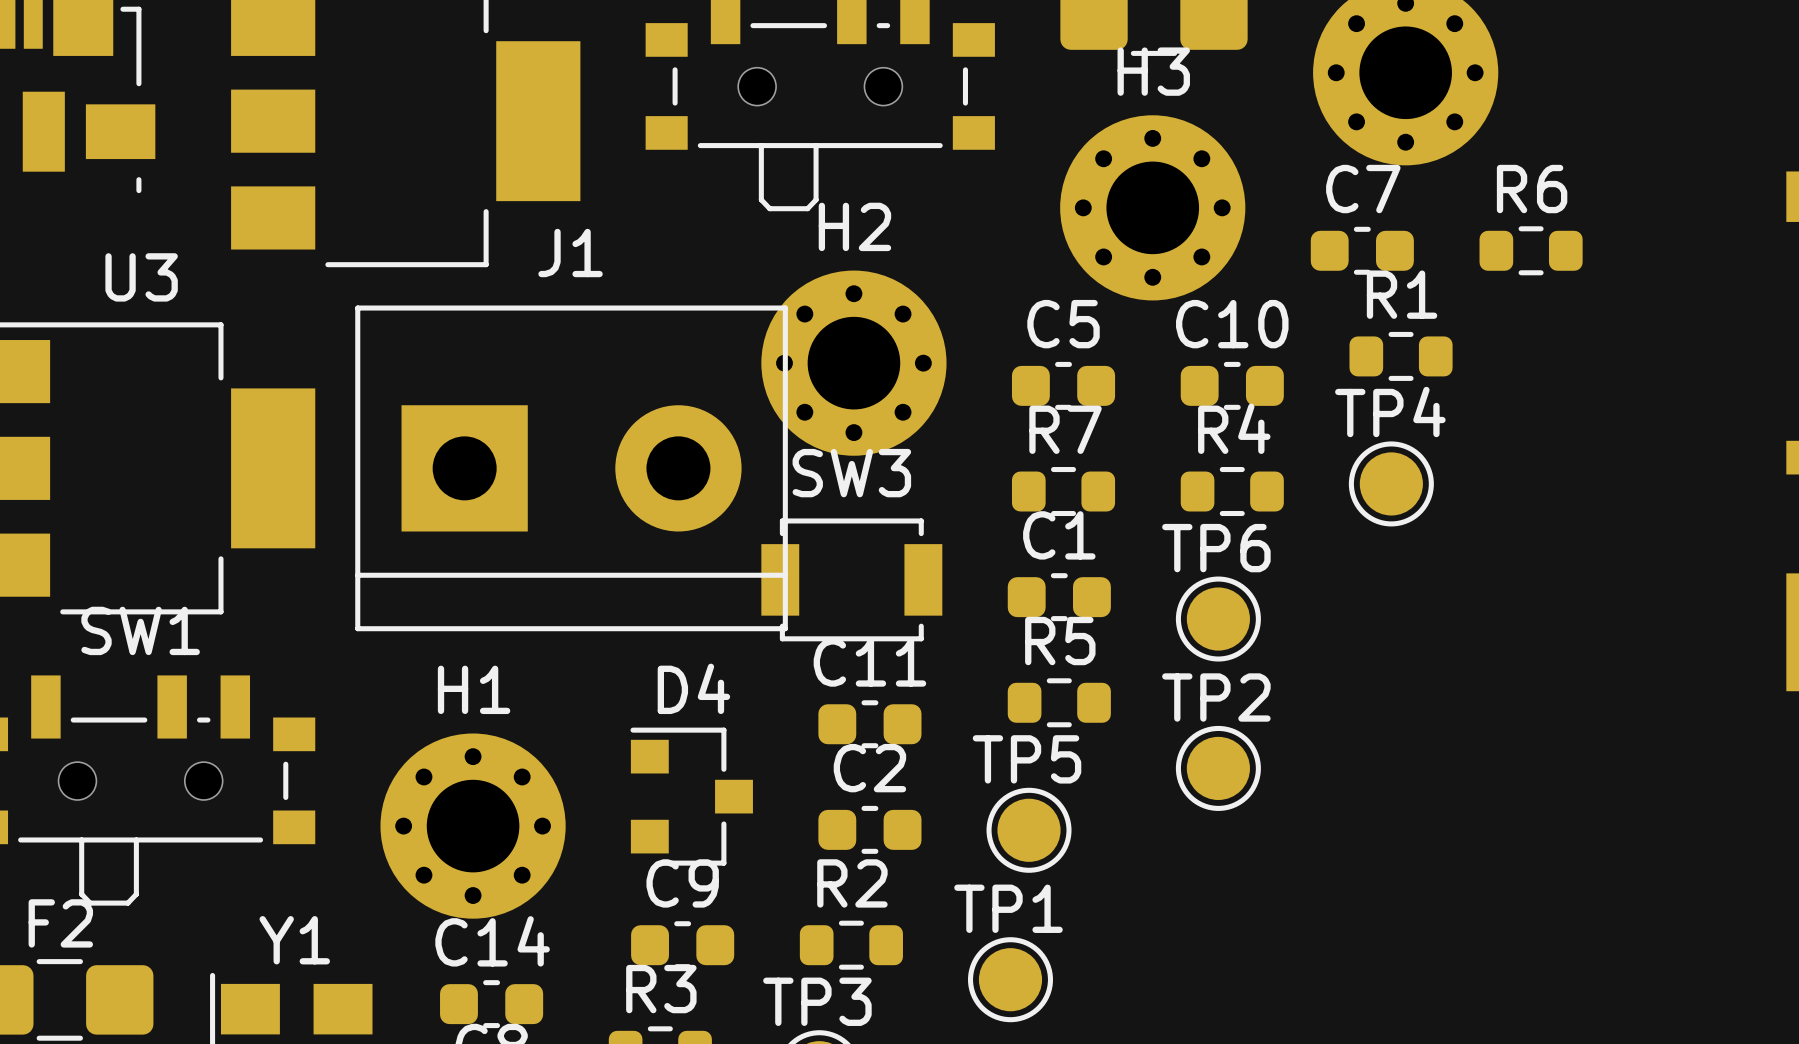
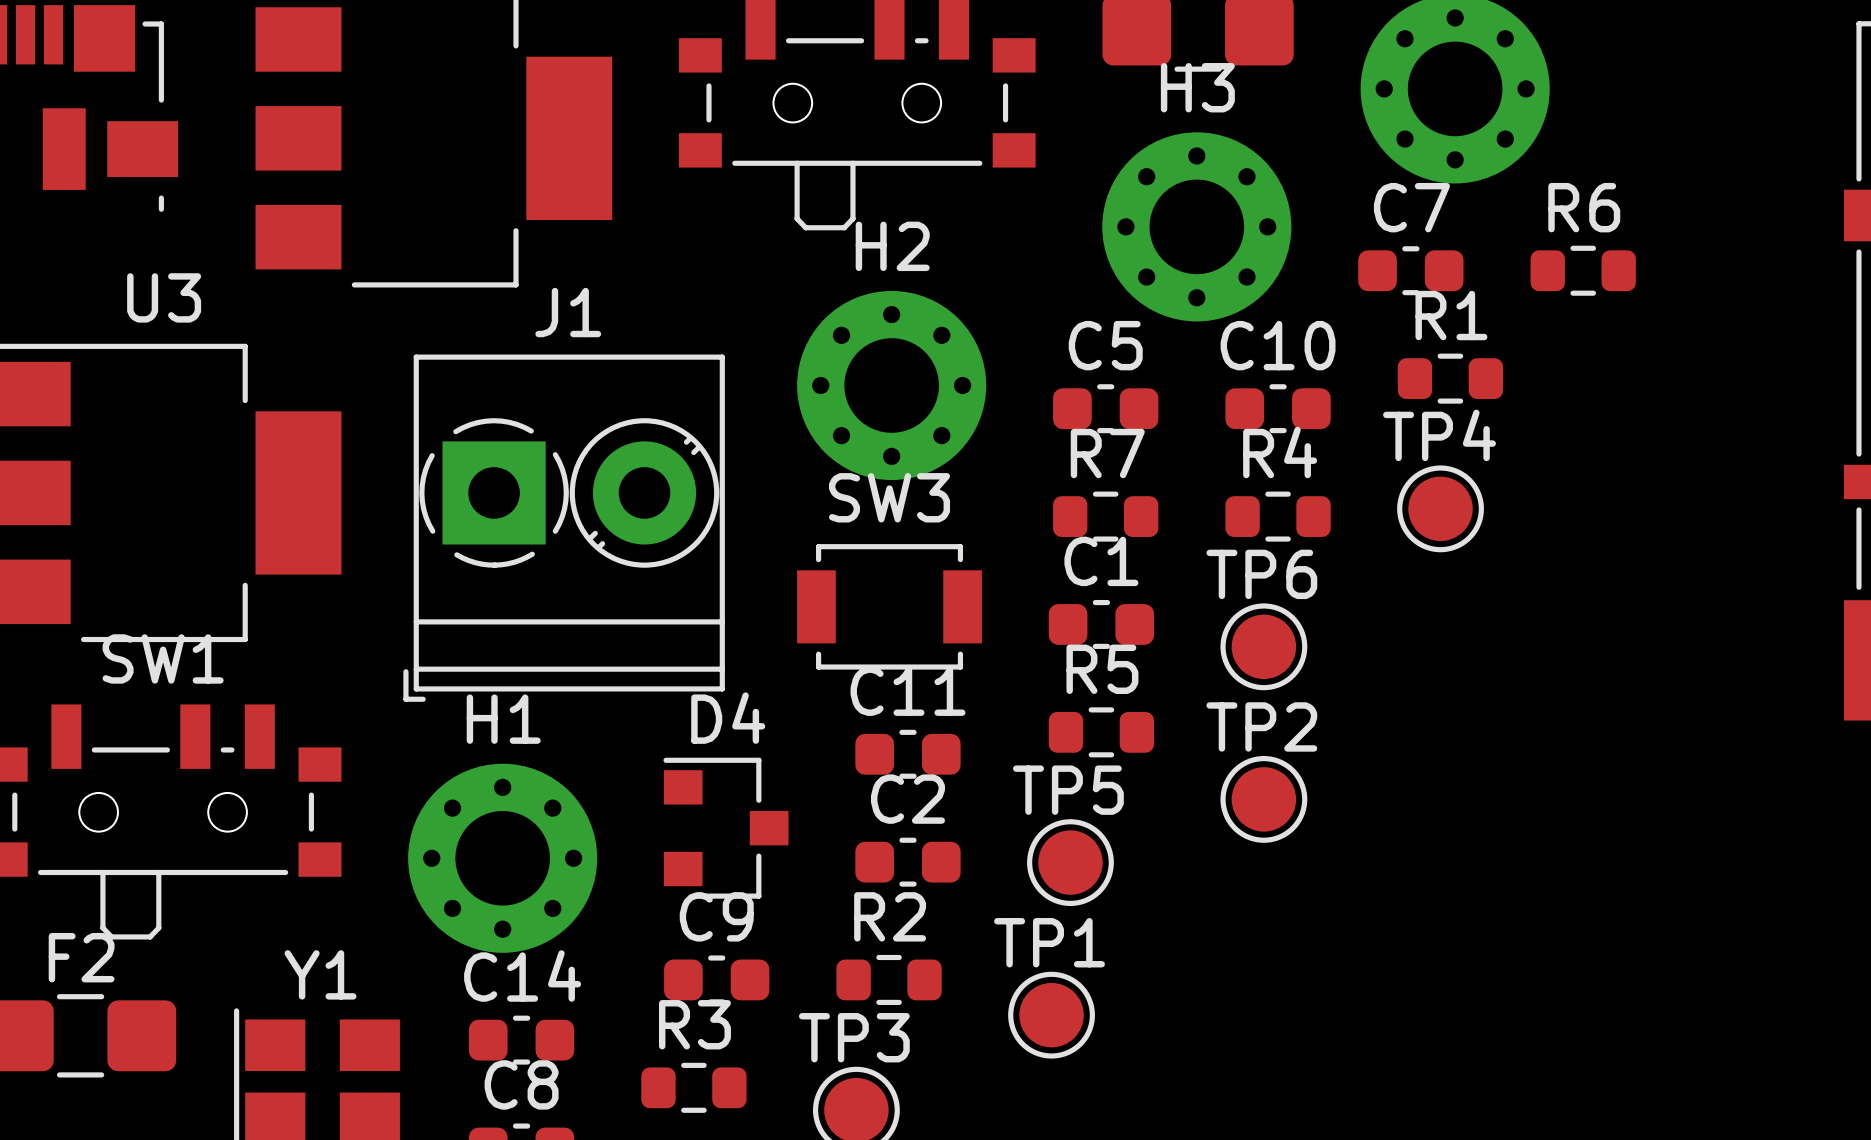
J1 footprint: [355, 305, 788, 632] -> [403, 354, 725, 702]

